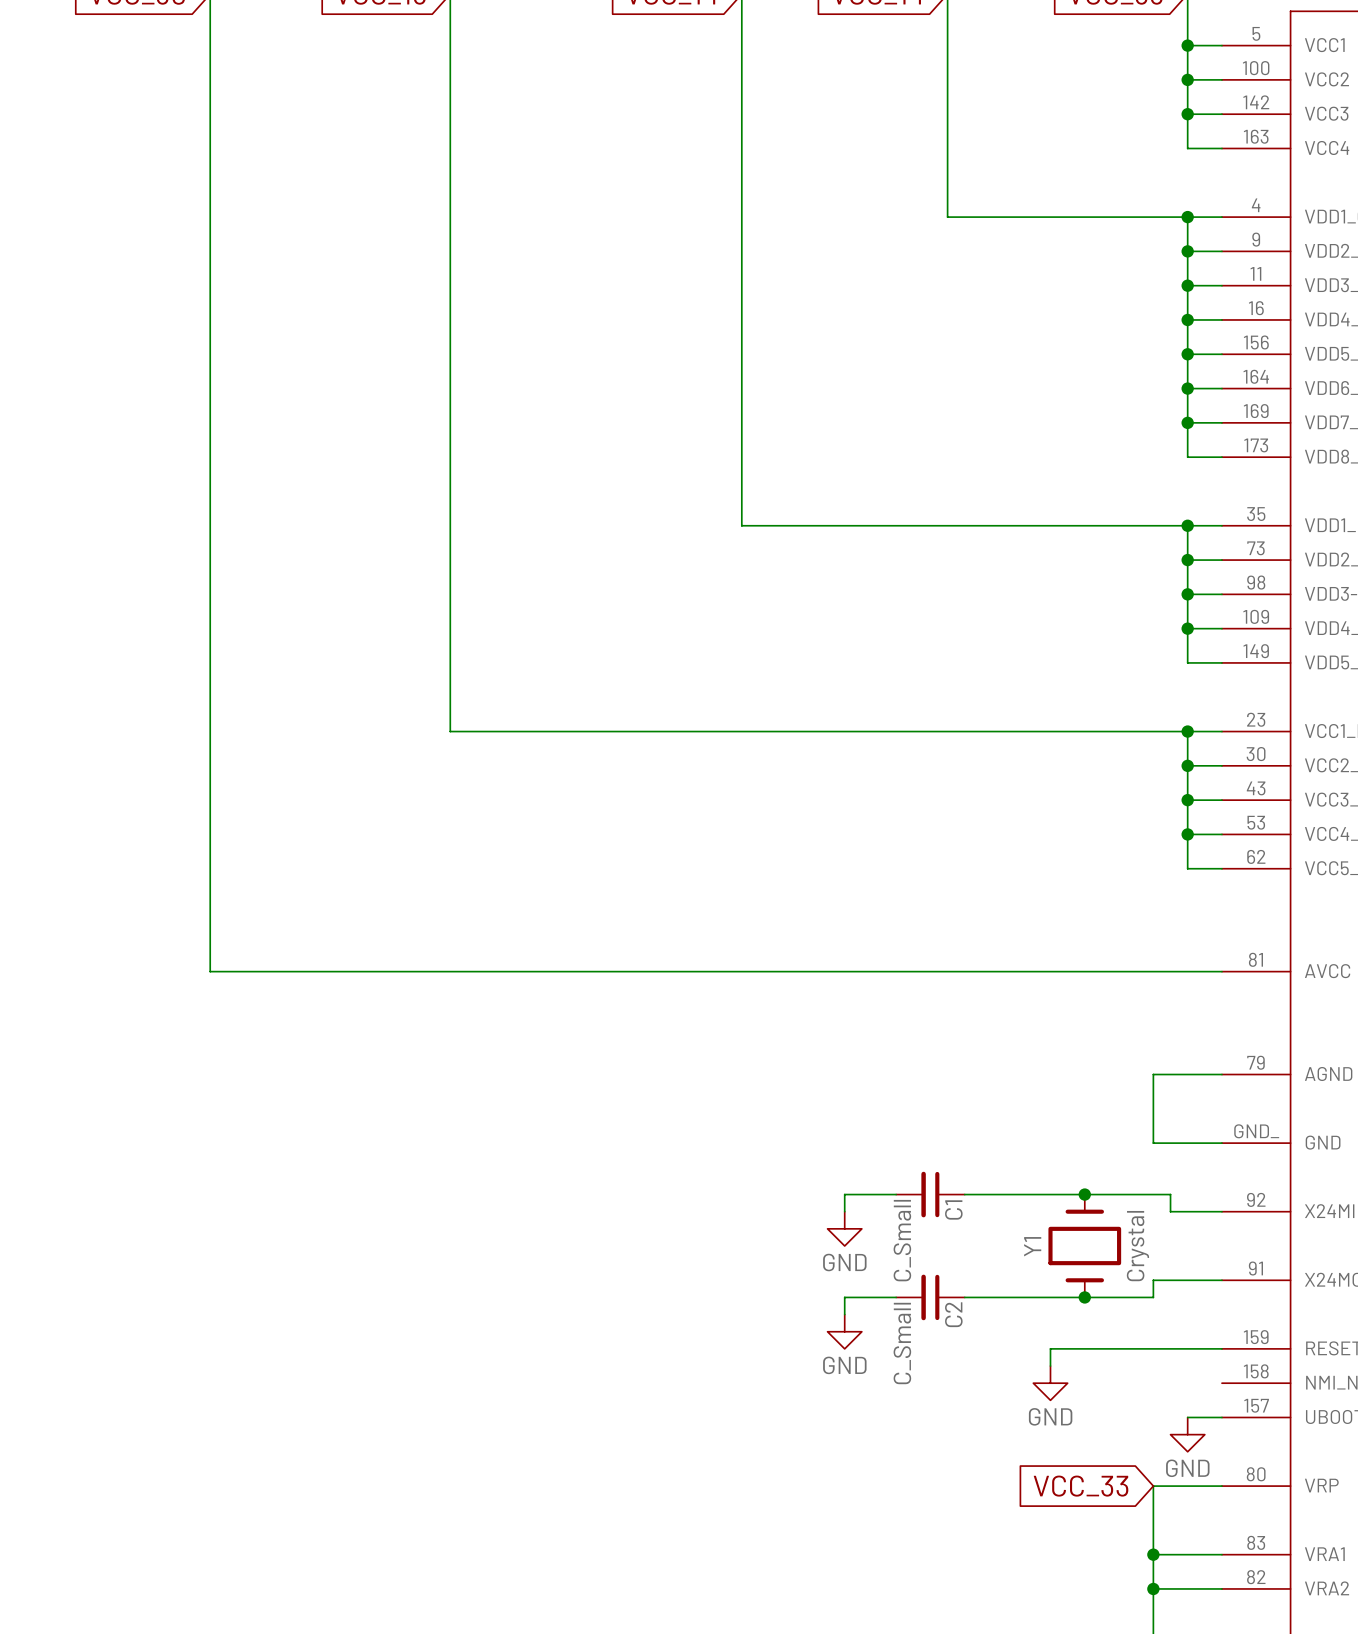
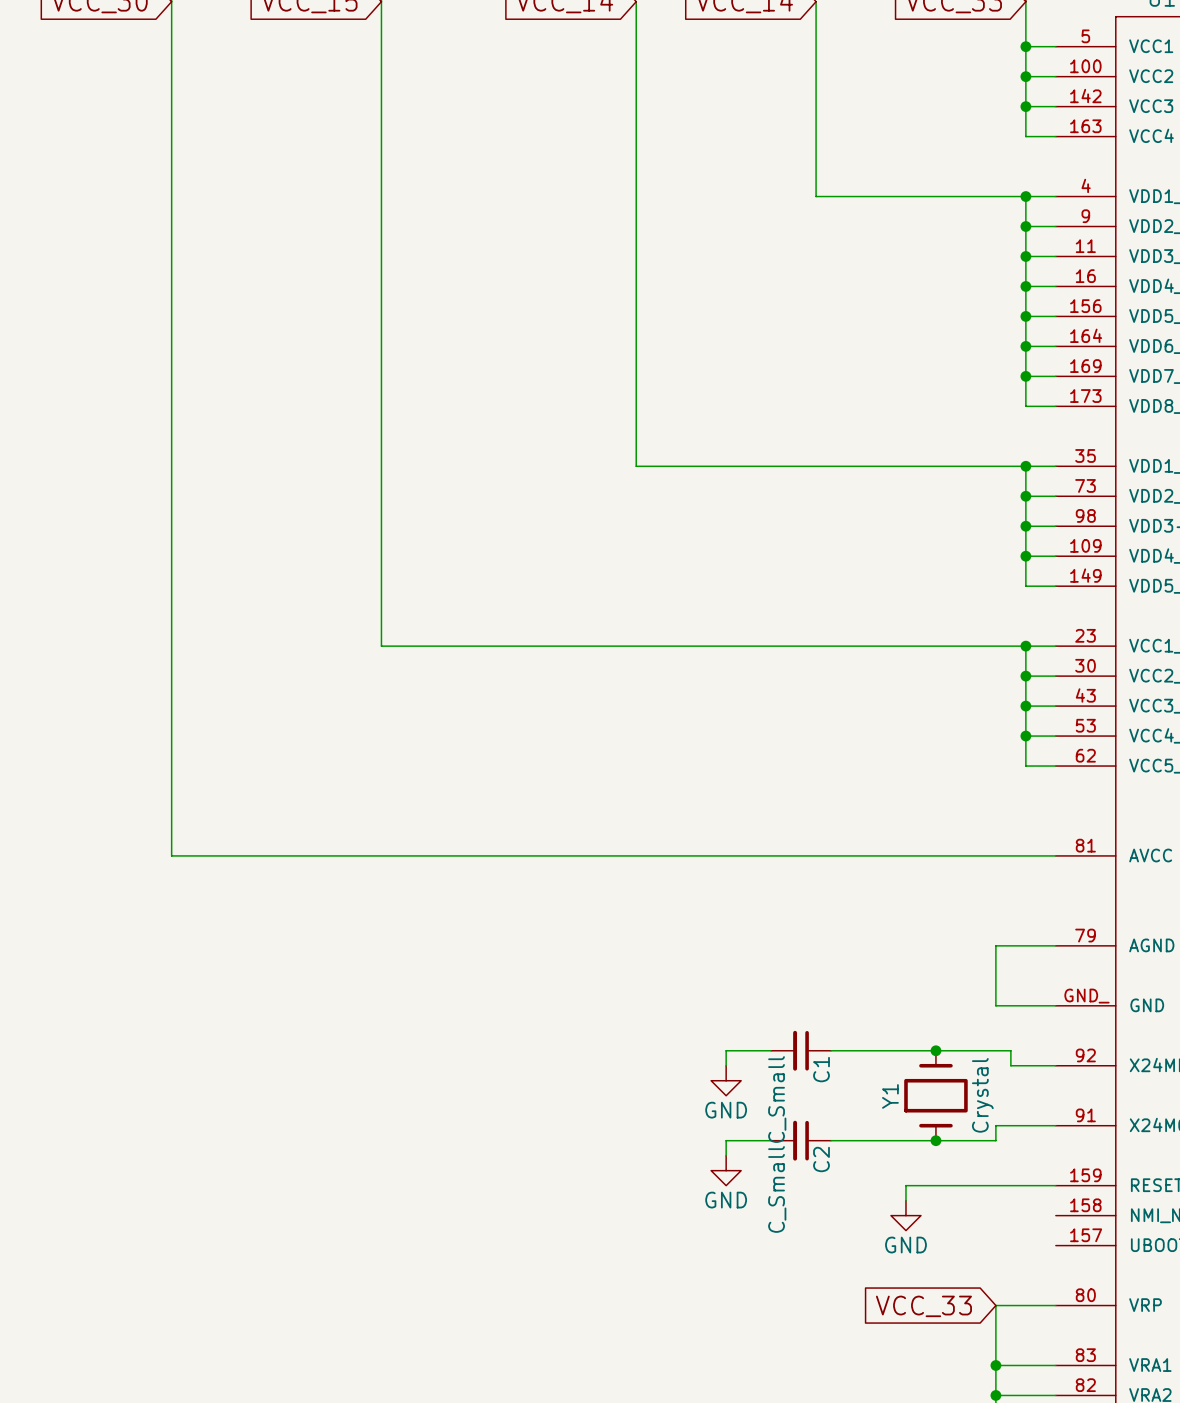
wire: (1187, 1417) (1221, 1417) -> none
power symbol: GND (1187, 1434) -> none

